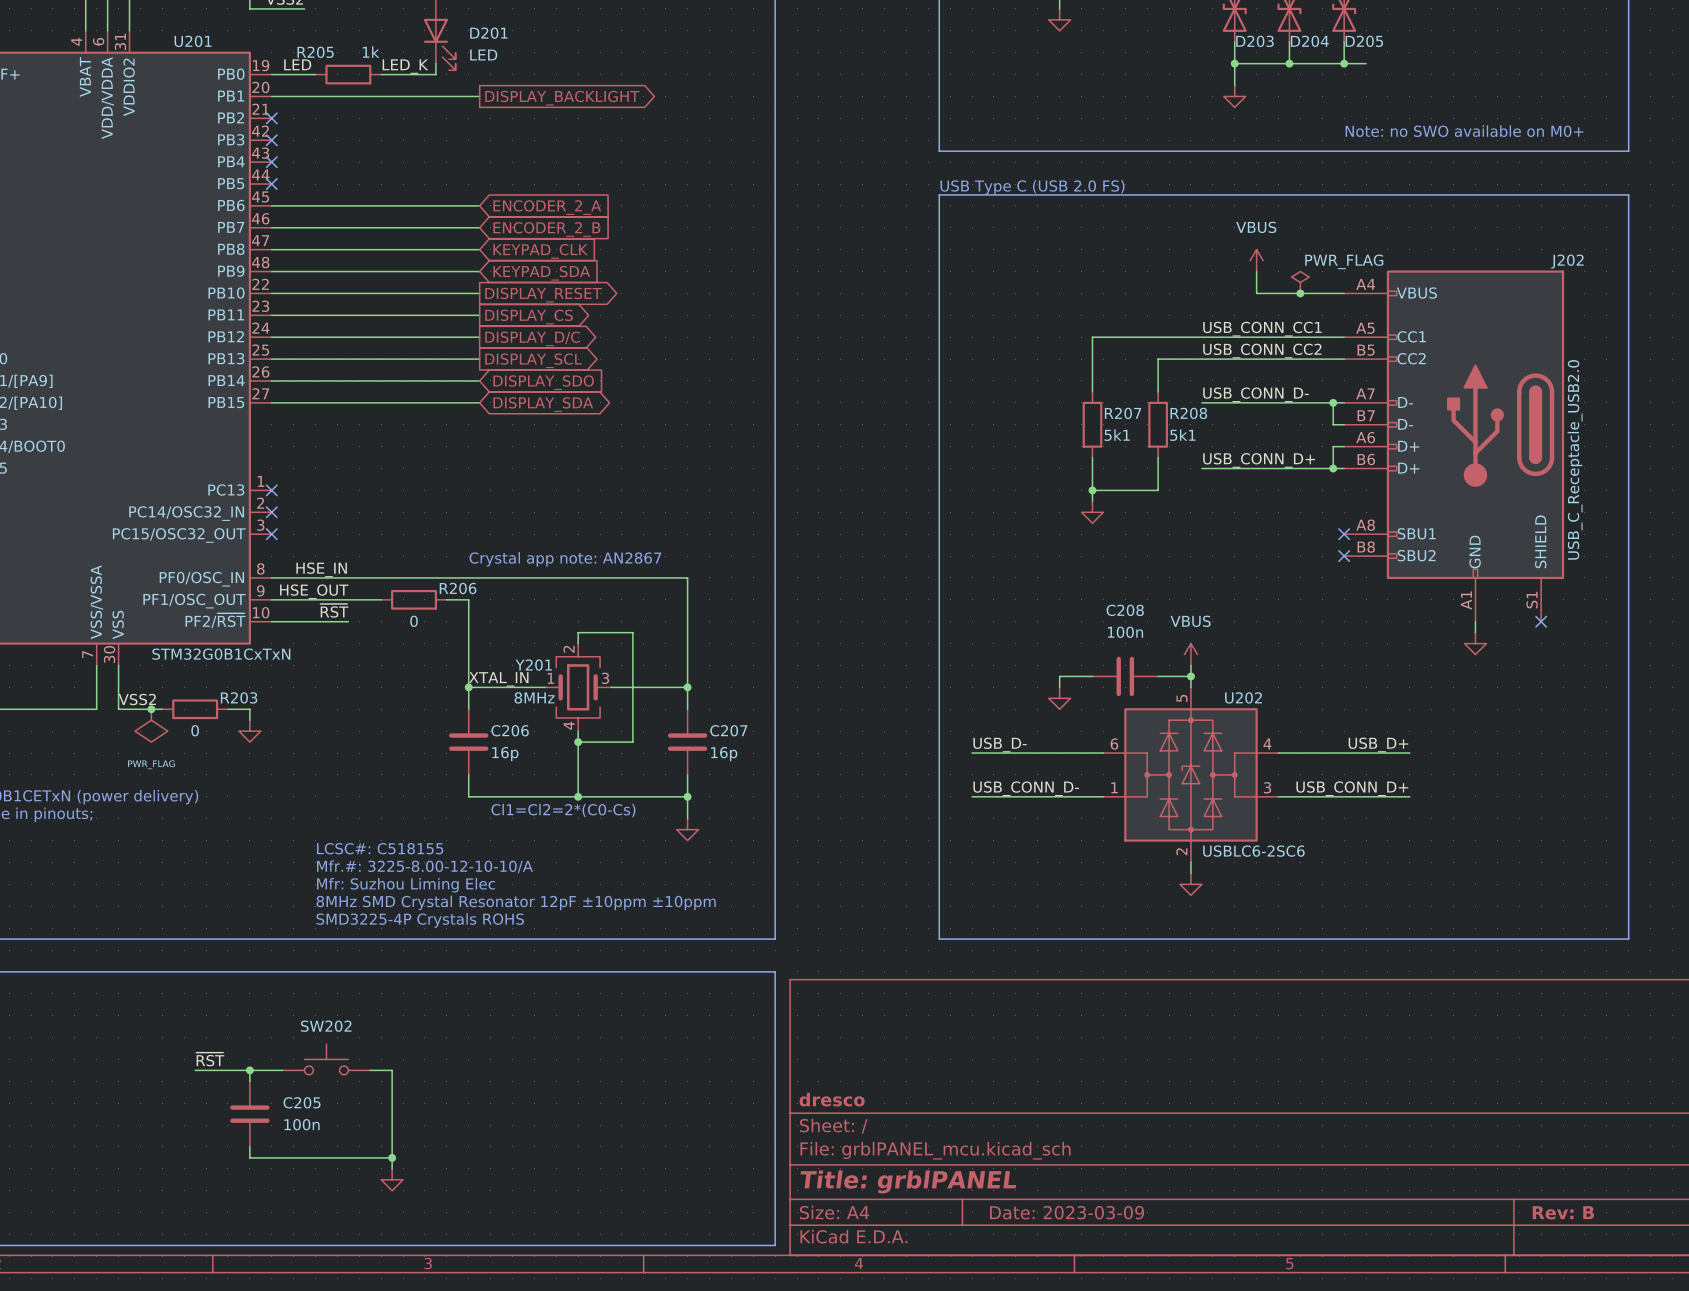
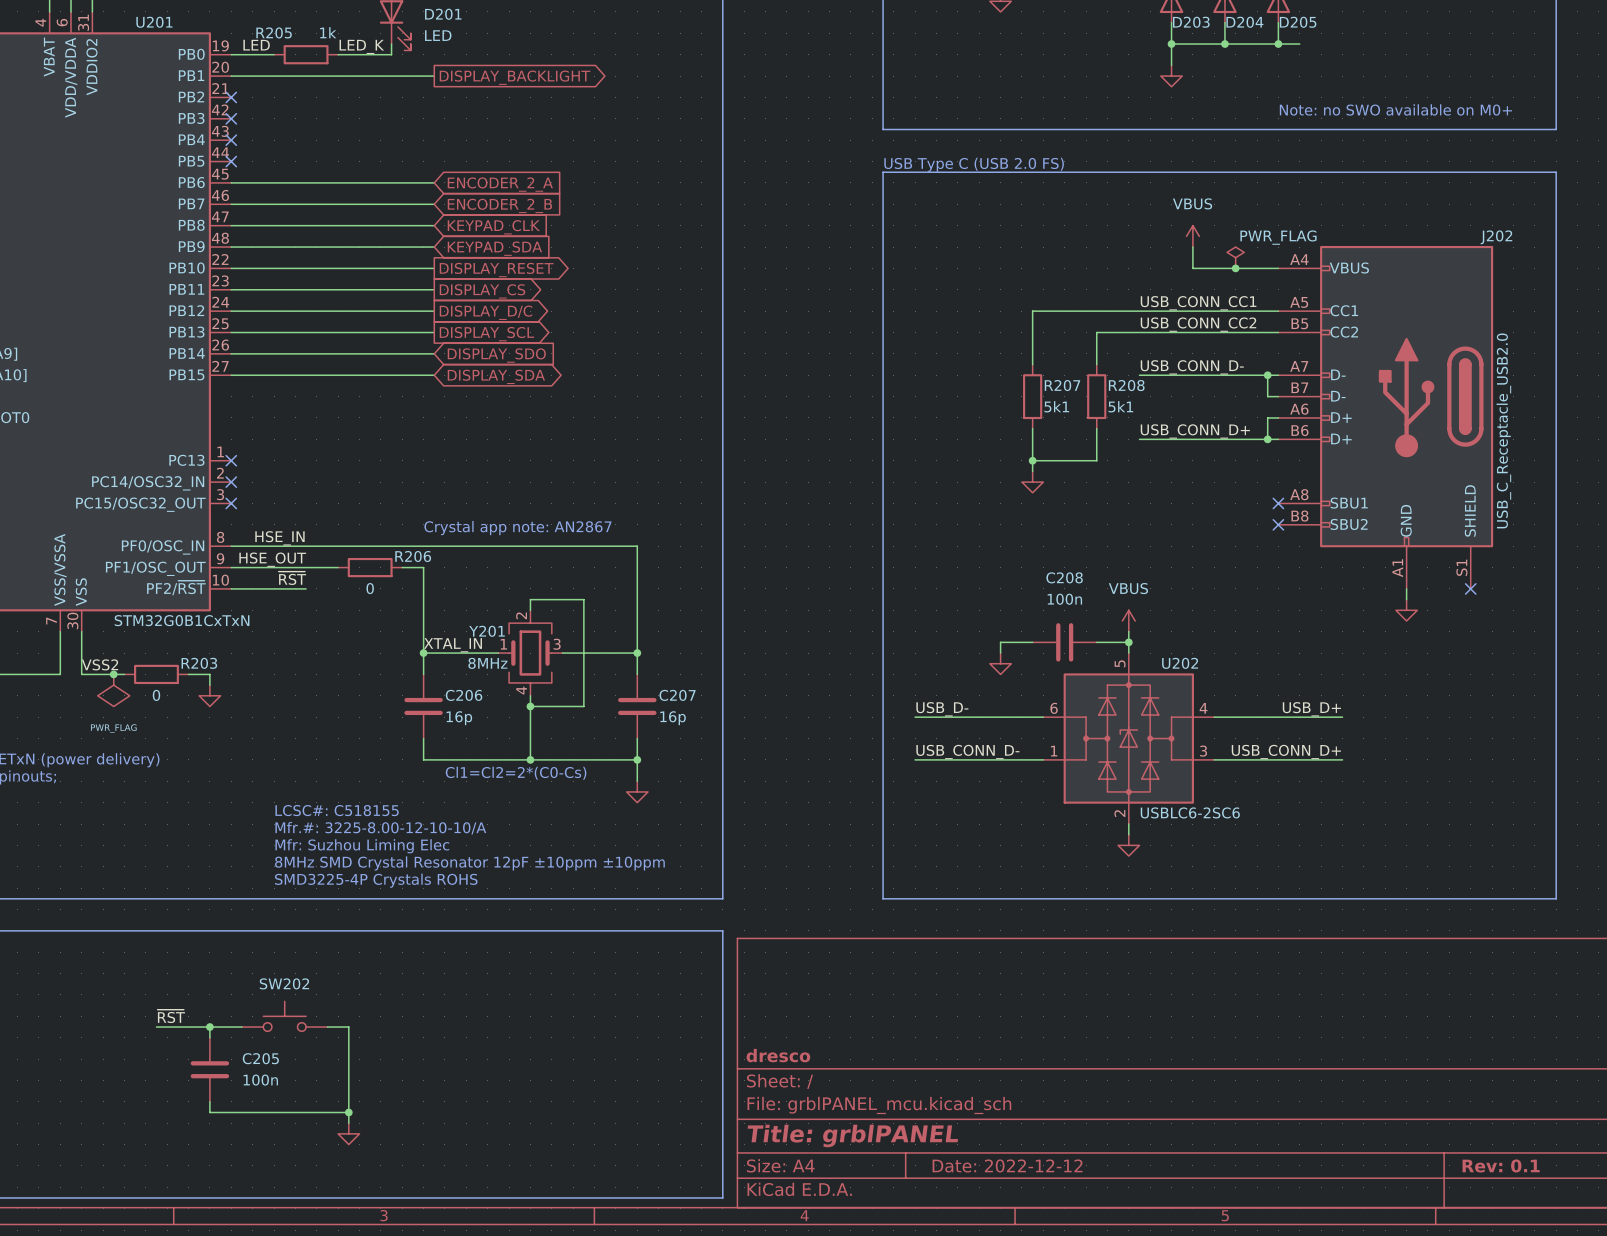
title block: Date: 2023-03-09 (1067, 1212) -> Date: 2022-12-12 (1007, 1165)
title block: Rev: B (1563, 1212) -> Rev: 0.1 (1501, 1165)

